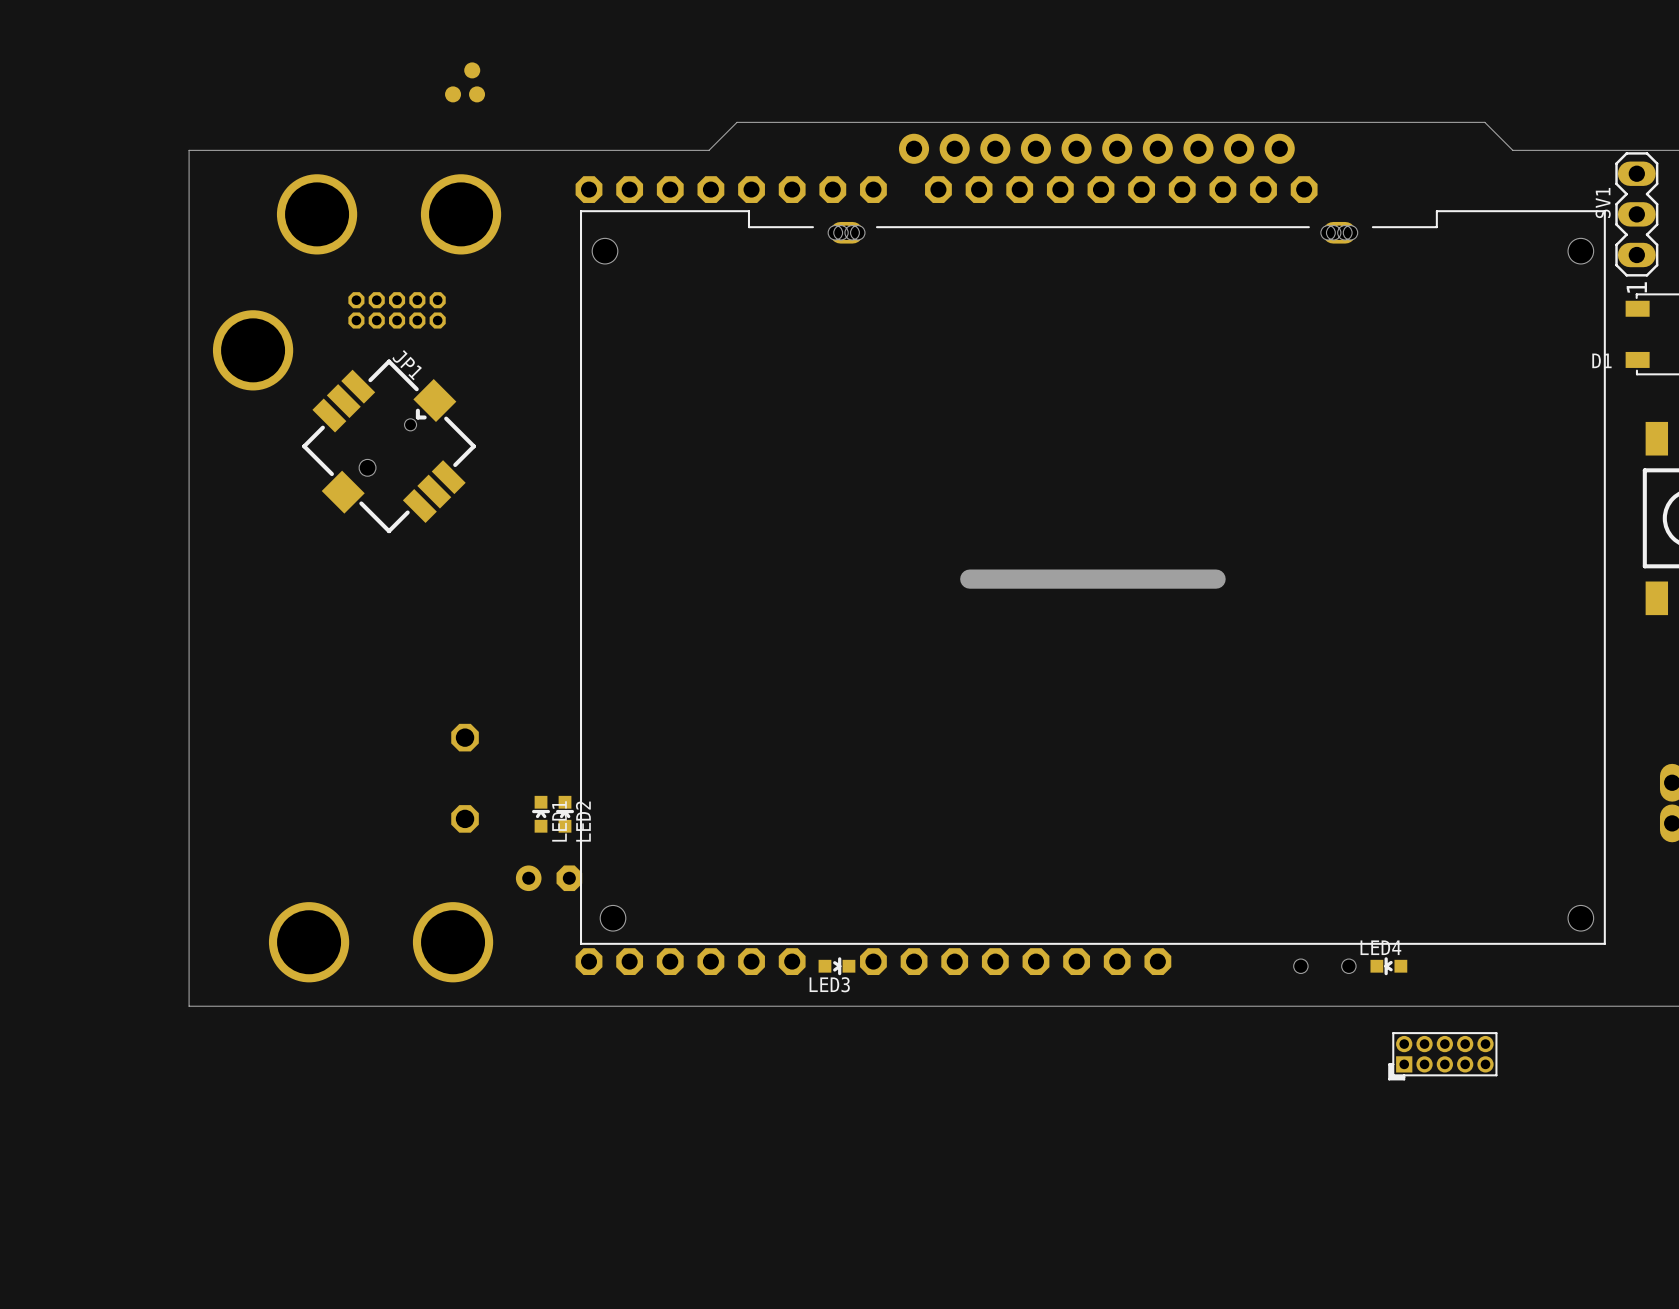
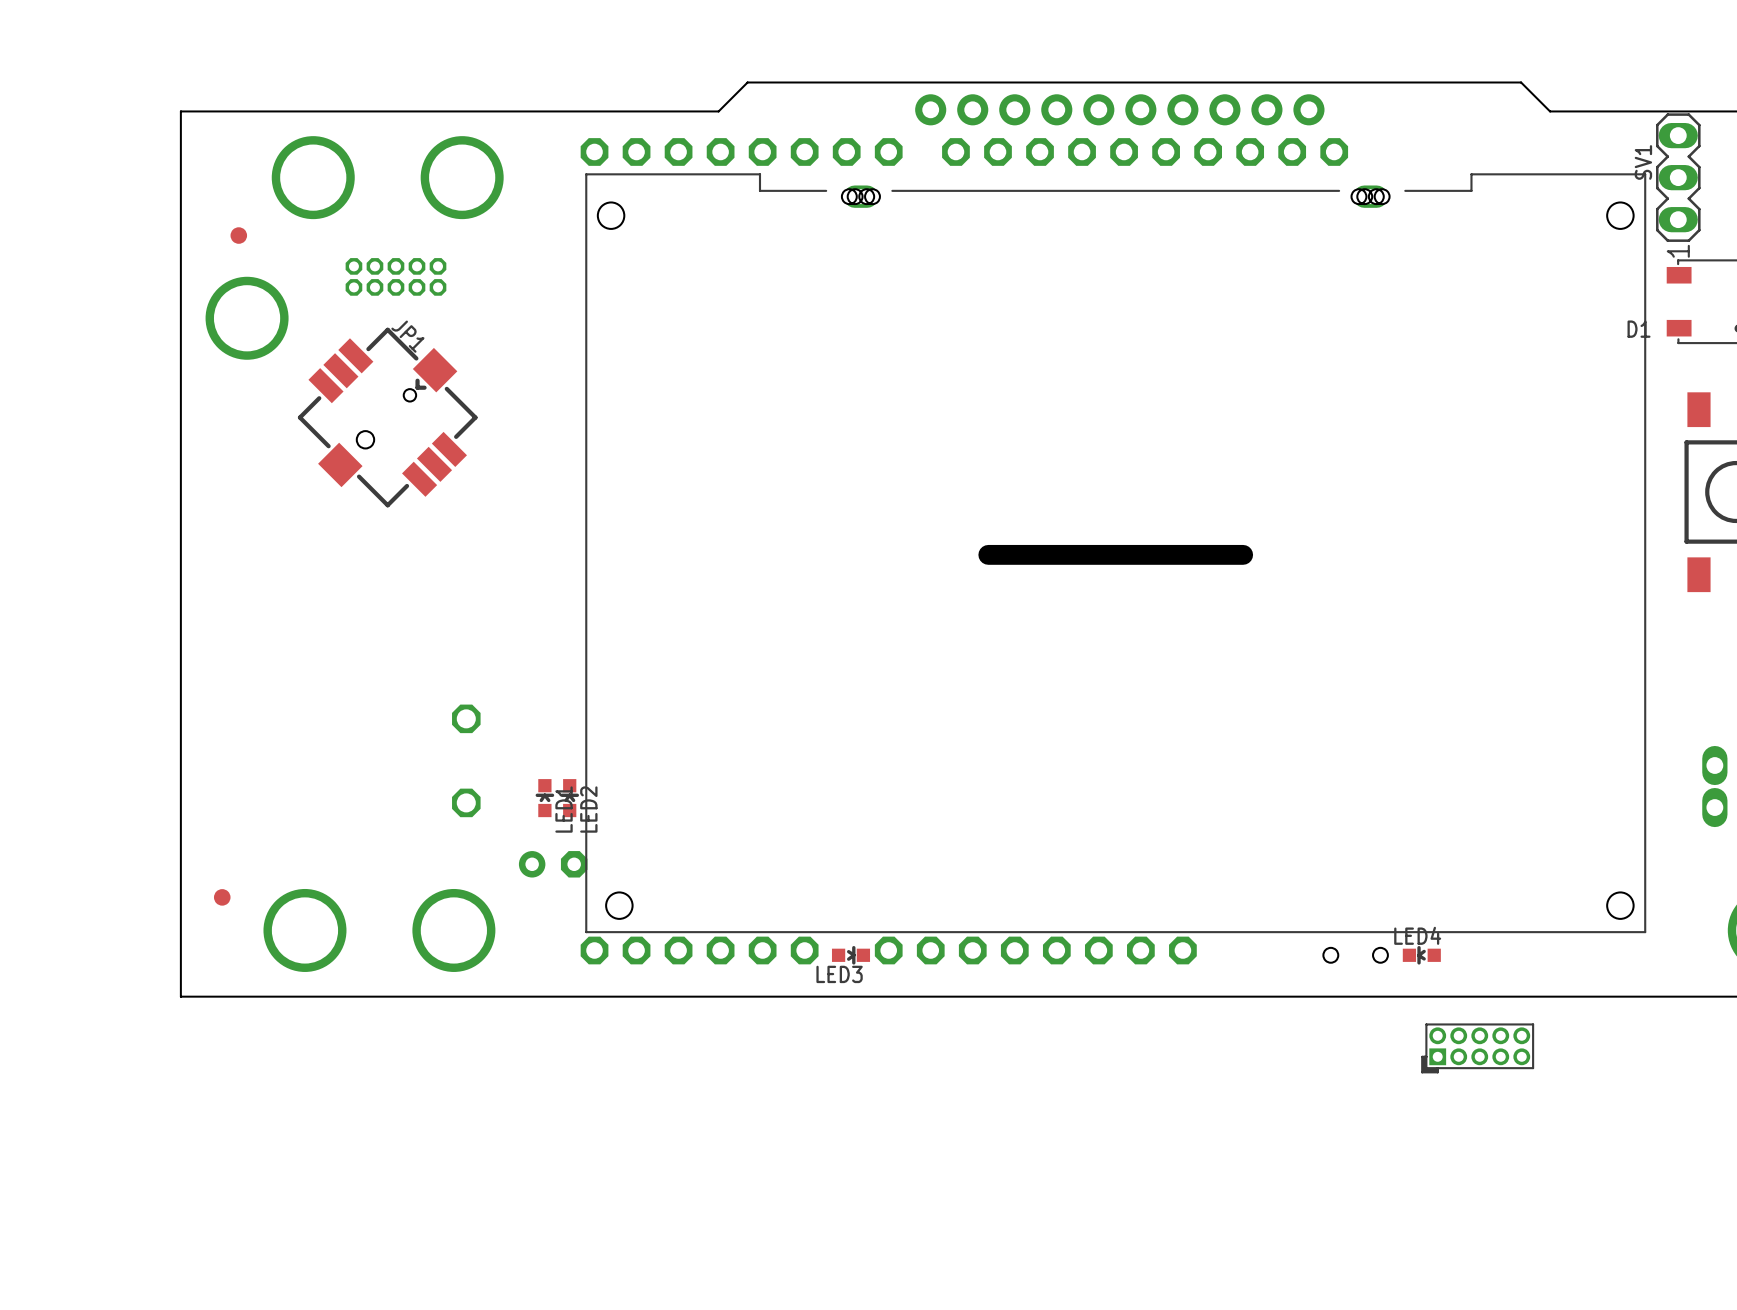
part: (472, 70) -> none
part: (453, 94) -> none
part: (477, 94) -> none
part: none -> (238, 235)
part: none -> (222, 897)

